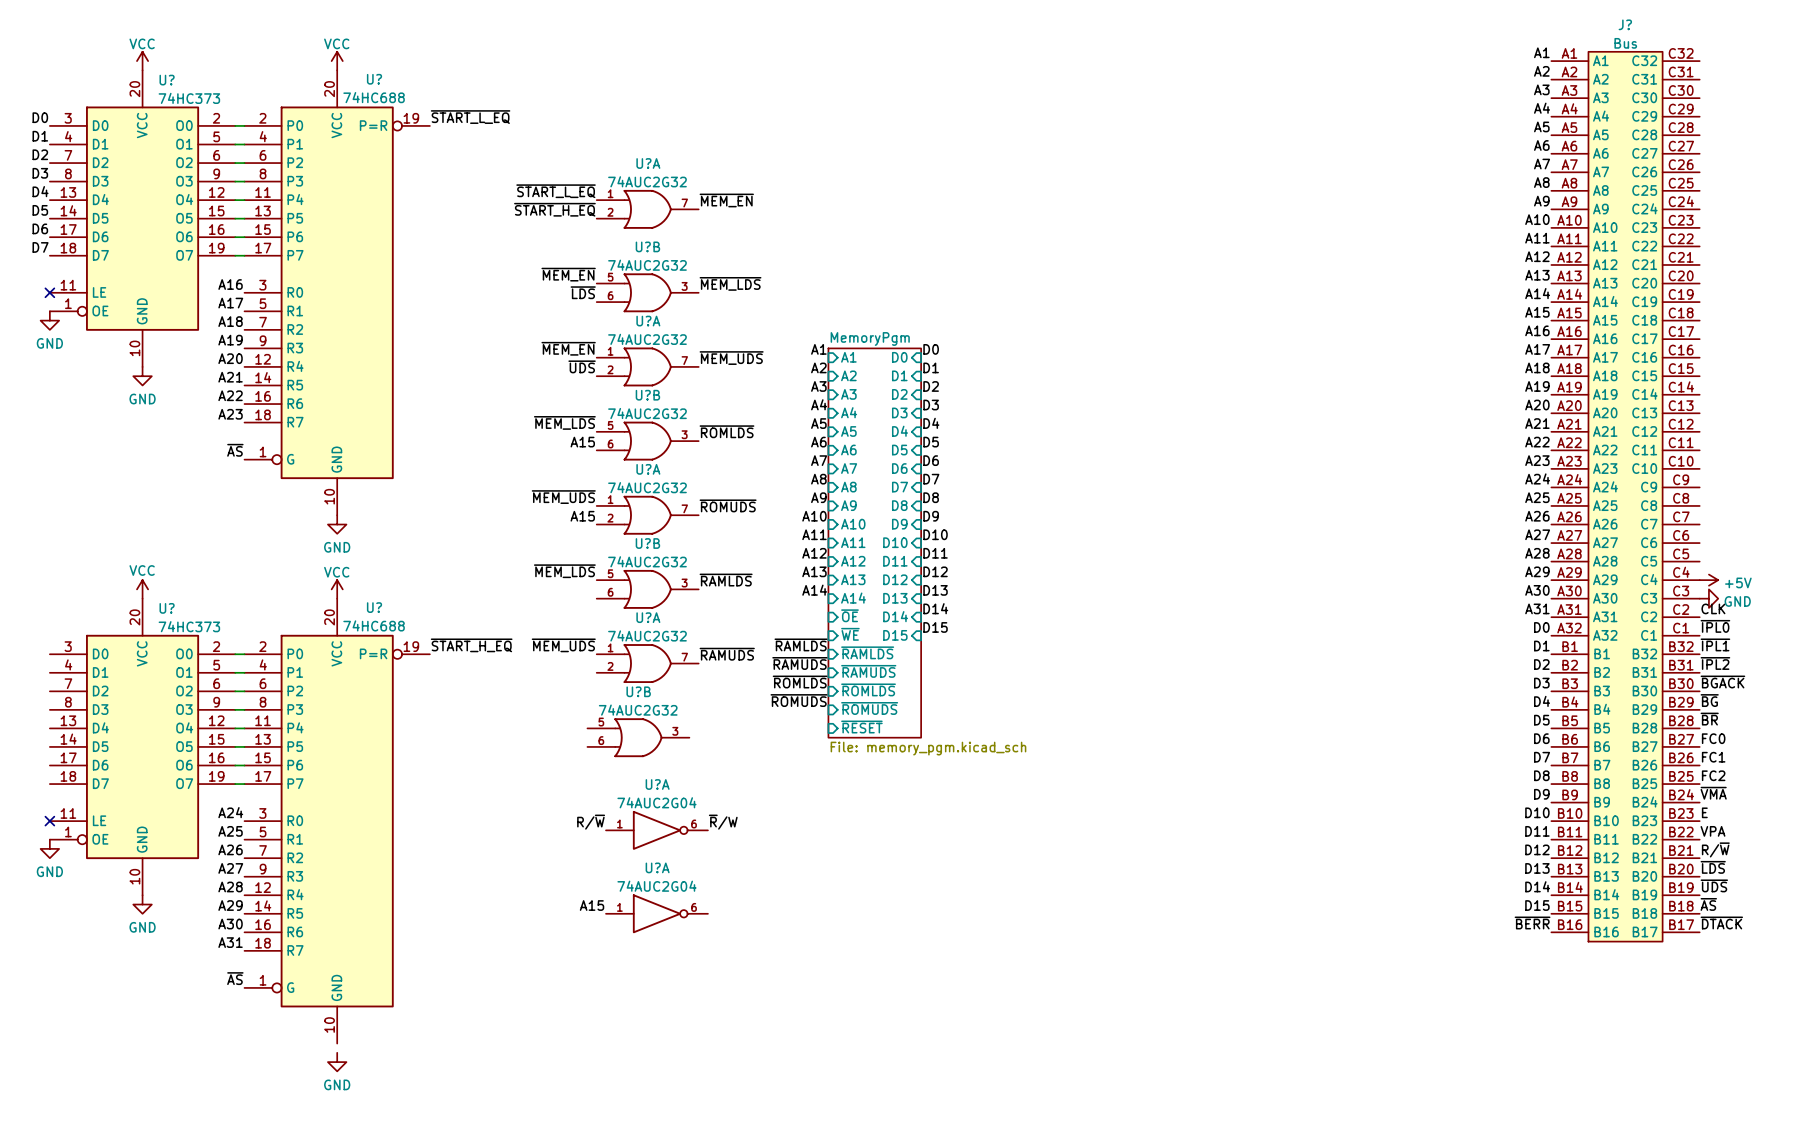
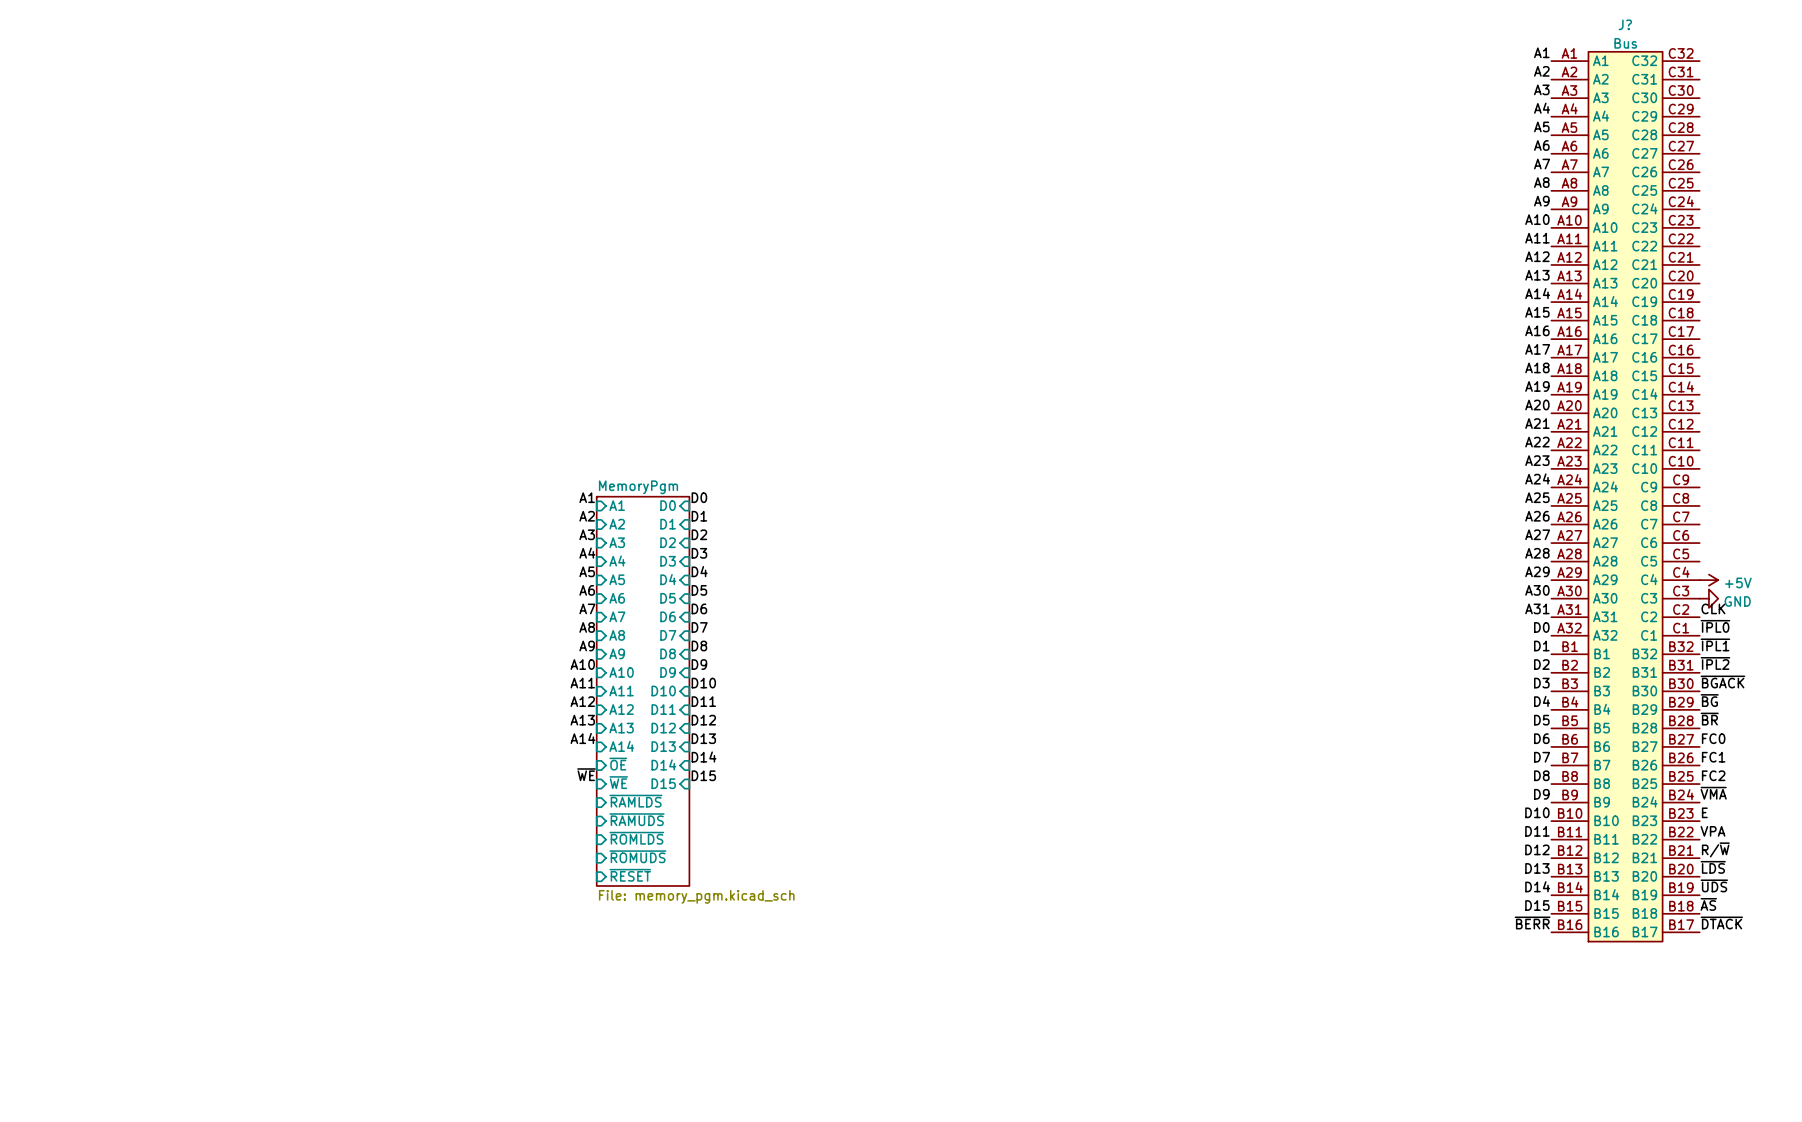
power symbol: VCC (142, 61) -> none
power symbol: VCC (337, 61) -> none
label: D0 (40, 117) -> none
label: ~{START_L_EQ} (470, 117) -> none
wire: (235, 125) (244, 125) -> none
label: D1 (40, 136) -> none
wire: (235, 144) (244, 144) -> none
label: D2 (40, 154) -> none
wire: (235, 163) (244, 163) -> none
label: D3 (40, 173) -> none
wire: (235, 181) (244, 181) -> none
label: D4 (40, 191) -> none
label: ~{START_L_EQ} (556, 191) -> none
wire: (235, 200) (244, 200) -> none
label: ~{MEM_EN} (726, 200) -> none
label: ~{START_H_EQ} (554, 209) -> none
U?A: 74AUC2G32 (647, 209) -> none
label: D5 (40, 210) -> none
U?: 74HC373 (142, 218) -> none
wire: (235, 218) (244, 218) -> none
label: D6 (40, 228) -> none
wire: (235, 237) (244, 237) -> none
label: D7 (40, 247) -> none
wire: (235, 255) (244, 255) -> none
label: ~{MEM_EN} (568, 274) -> none
label: ~{MEM_LDS} (730, 283) -> none
label: A16 (230, 284) -> none
no-connect mark: (49, 292) -> none
U?: 74HC688 (337, 292) -> none
label: ~{LDS} (583, 292) -> none
U?B: 74AUC2G32 (647, 292) -> none
label: A17 (230, 303) -> none
power symbol: GND (49, 320) -> none
label: A18 (230, 321) -> none
label: A19 (230, 340) -> none
label: ~{MEM_EN} (568, 348) -> none
label: A1 (818, 349) -> none
label: D0 (931, 349) -> none
sheet pin: A1 (848, 357) -> none
sheet pin: D0 (899, 357) -> none
label: A20 (230, 358) -> none
label: ~{MEM_UDS} (731, 358) -> none
label: ~{UDS} (582, 366) -> none
U?A: 74AUC2G32 (647, 366) -> none
label: A2 (818, 367) -> none
label: D1 (931, 367) -> none
sheet pin: A2 (848, 375) -> none
sheet pin: D1 (899, 375) -> none
power symbol: GND (142, 376) -> none
label: A21 (230, 377) -> none
label: A3 (818, 386) -> none
label: D2 (931, 386) -> none
sheet pin: A3 (848, 394) -> none
sheet pin: D2 (899, 394) -> none
label: A22 (230, 395) -> none
label: A4 (819, 404) -> none
label: D3 (931, 405) -> none
sheet pin: A4 (849, 412) -> none
sheet pin: D3 (899, 412) -> none
label: A23 (230, 414) -> none
label: ~{MEM_LDS} (564, 422) -> none
label: A5 (818, 423) -> none
label: D4 (931, 423) -> none
label: ~{ROMLDS} (726, 431) -> none
sheet pin: A5 (848, 431) -> none
sheet pin: D4 (900, 431) -> none
U?B: 74AUC2G32 (647, 441) -> none
label: A15 (582, 442) -> none
label: A6 (818, 442) -> none
label: D5 (931, 442) -> none
label: ~{AS} (235, 450) -> none
sheet pin: A6 (848, 450) -> none
sheet pin: D5 (899, 450) -> none
label: A7 (819, 460) -> none
label: D6 (931, 460) -> none
sheet pin: A7 (849, 468) -> none
sheet pin: D6 (899, 468) -> none
label: A8 (818, 479) -> none
label: D7 (931, 479) -> none
sheet pin: A8 (848, 487) -> none
sheet pin: D7 (900, 487) -> none
label: ~{MEM_UDS} (563, 497) -> A1 (587, 497)
label: none -> D0 (699, 497)
label: A9 (818, 497) -> none
label: D8 (931, 497) -> none
sheet pin: none -> A1 (617, 505)
sheet pin: none -> D0 (668, 505)
label: ~{ROMUDS} (728, 505) -> none
sheet pin: A9 (848, 505) -> none
sheet pin: D8 (899, 505) -> none
U?A: 74AUC2G32 (647, 515) -> none
label: A15 (582, 516) -> A2 (587, 516)
label: none -> D1 (699, 516)
label: A10 (814, 516) -> none
label: D9 (931, 516) -> none
power symbol: GND (337, 524) -> none
sheet pin: none -> A2 (617, 524)
sheet pin: none -> D1 (668, 524)
sheet pin: A10 (853, 524) -> none
sheet pin: D9 (899, 524) -> none
label: none -> A3 (587, 534)
label: none -> D2 (699, 534)
label: A11 (814, 534) -> none
label: D10 (935, 534) -> none
sheet pin: none -> A3 (617, 542)
sheet pin: none -> D2 (668, 542)
sheet pin: A11 (853, 542) -> none
sheet pin: D10 (895, 542) -> none
sheet MemoryPgm: File: memory_pgm.kicad_sch (874, 543) -> none
label: none -> A4 (587, 553)
label: none -> D3 (699, 553)
label: A12 (814, 553) -> none
label: D11 (935, 553) -> none
sheet pin: none -> A4 (617, 561)
sheet pin: none -> D3 (668, 561)
sheet pin: A12 (853, 561) -> none
sheet pin: D11 (895, 561) -> none
label: ~{MEM_LDS} (564, 571) -> A5 (587, 571)
label: none -> D4 (699, 571)
label: A13 (814, 571) -> none
label: D12 (935, 571) -> none
sheet pin: none -> A5 (617, 579)
sheet pin: none -> D4 (668, 579)
sheet pin: A13 (853, 579) -> none
sheet pin: D12 (895, 579) -> none
label: ~{RAMLDS} (726, 580) -> none
power symbol: VCC (142, 589) -> none
power symbol: VCC (337, 589) -> none
U?B: 74AUC2G32 (647, 589) -> none
label: none -> A6 (587, 590)
label: none -> D5 (699, 590)
label: A14 (814, 590) -> none
label: D13 (935, 590) -> none
sheet pin: none -> A6 (617, 598)
sheet pin: none -> D5 (668, 598)
sheet pin: A14 (853, 598) -> none
sheet pin: D13 (895, 598) -> none
label: none -> A7 (587, 608)
label: none -> D6 (699, 608)
label: D14 (935, 608) -> none
sheet pin: ~{OE} (849, 615) -> none
sheet pin: none -> A7 (617, 616)
sheet pin: none -> D6 (668, 616)
sheet pin: D14 (895, 616) -> none
label: none -> A8 (587, 627)
label: none -> D7 (699, 627)
label: D15 (935, 627) -> none
sheet pin: ~{WE} (850, 634) -> none
sheet pin: none -> A8 (617, 635)
sheet pin: none -> D7 (668, 635)
sheet pin: D15 (895, 635) -> none
label: ~{RAMLDS} (801, 644) -> none
label: ~{START_H_EQ} (471, 645) -> none
label: ~{MEM_UDS} (563, 645) -> A9 (587, 646)
label: none -> D8 (699, 646)
sheet pin: ~{RAMLDS} (867, 652) -> none
sheet pin: none -> A9 (617, 653)
sheet pin: none -> D8 (668, 653)
wire: (235, 654) (244, 654) -> none
label: ~{RAMUDS} (727, 654) -> none
U?A: 74AUC2G32 (647, 663) -> none
label: ~{RAMUDS} (799, 663) -> none
label: none -> A10 (582, 664)
label: none -> D9 (699, 664)
sheet pin: ~{RAMUDS} (868, 671) -> none
wire: (235, 672) (244, 672) -> none
sheet pin: none -> A10 (621, 672)
sheet pin: none -> D9 (668, 672)
label: ~{ROMLDS} (800, 682) -> none
label: none -> A11 (582, 683)
label: none -> D10 (703, 683)
sheet pin: ~{ROMLDS} (868, 689) -> none
wire: (235, 691) (244, 691) -> none
sheet pin: none -> A11 (621, 691)
sheet MemoryPgm: none -> File: memory_pgm.kicad_sch (643, 691)
sheet pin: none -> D10 (663, 691)
label: ~{ROMUDS} (799, 700) -> none
label: none -> A12 (582, 701)
label: none -> D11 (703, 701)
sheet pin: ~{ROMUDS} (869, 708) -> none
wire: (235, 709) (244, 709) -> none
sheet pin: none -> A12 (621, 709)
sheet pin: none -> D11 (663, 709)
label: none -> A13 (582, 720)
label: none -> D12 (703, 720)
sheet pin: ~{RESET} (861, 727) -> none
wire: (235, 728) (244, 728) -> none
sheet pin: none -> A13 (621, 728)
sheet pin: none -> D12 (663, 728)
U?B: 74AUC2G32 (638, 737) -> none
label: none -> A14 (582, 738)
label: none -> D13 (703, 738)
U?: 74HC373 (142, 746) -> none
wire: (235, 746) (244, 746) -> none
sheet pin: none -> A14 (621, 746)
sheet pin: none -> D13 (663, 746)
label: none -> D14 (704, 757)
sheet pin: none -> ~{OE} (618, 764)
sheet pin: none -> D14 (663, 764)
wire: (235, 765) (244, 765) -> none
label: none -> ~{WE} (586, 774)
label: none -> D15 (703, 775)
sheet pin: none -> ~{WE} (618, 782)
sheet pin: none -> D15 (663, 783)
wire: (235, 784) (244, 784) -> none
sheet pin: none -> ~{RAMLDS} (635, 801)
label: A24 (230, 812) -> none
sheet pin: none -> ~{RAMUDS} (637, 819)
no-connect mark: (49, 821) -> none
U?: 74HC688 (337, 821) -> none
label: R/~{W} (591, 822) -> none
label: ~{R}/W (723, 822) -> none
U?A: 74AUC2G04 (656, 830) -> none
label: A25 (230, 831) -> none
sheet pin: none -> ~{ROMLDS} (636, 838)
power symbol: GND (49, 848) -> none
label: A26 (230, 849) -> none
sheet pin: none -> ~{ROMUDS} (637, 856)
label: A27 (230, 868) -> none
sheet pin: none -> ~{RESET} (630, 875)
label: A28 (230, 886) -> none
power symbol: GND (142, 904) -> none
label: A29 (230, 905) -> none
label: A15 (592, 905) -> none
U?A: 74AUC2G04 (656, 913) -> none
label: A30 (230, 924) -> none
label: A31 (230, 942) -> none
label: ~{AS} (235, 978) -> none
power symbol: GND (337, 1062) -> none

